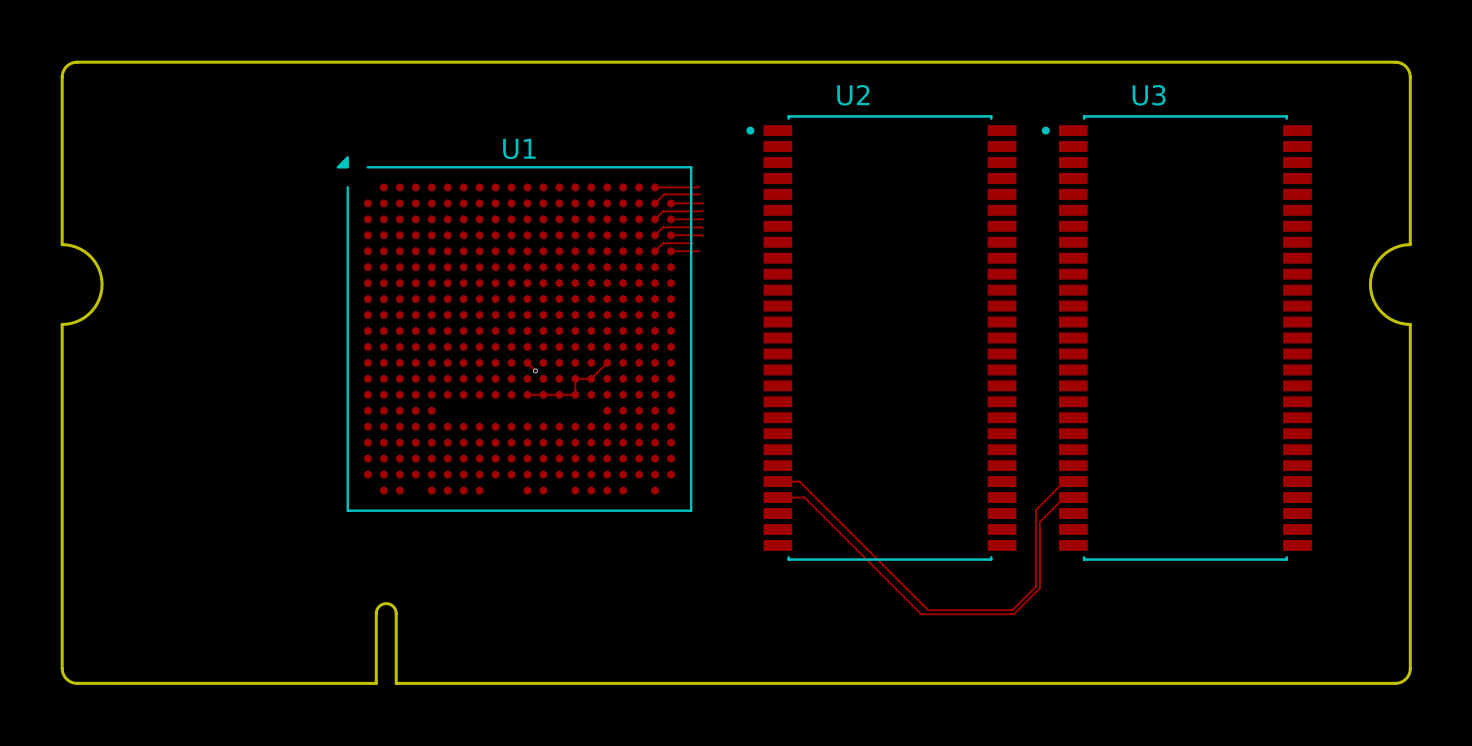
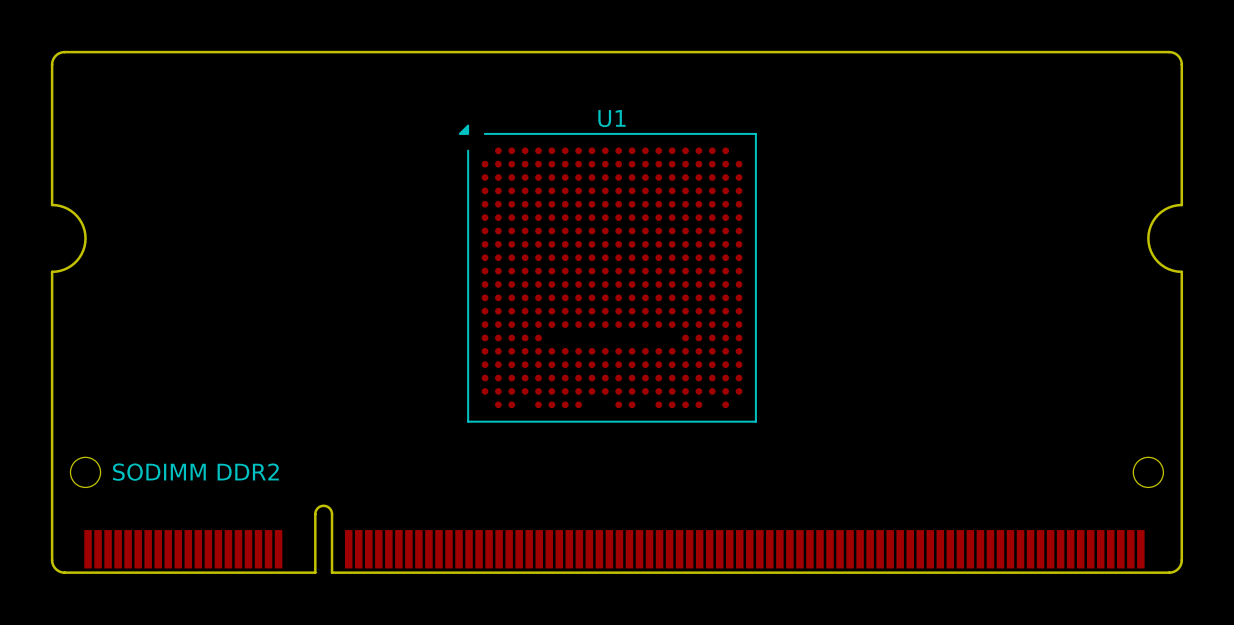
track: (698, 186) (655, 187) -> none
track: (699, 194) (664, 194) (655, 203) -> none
track: (671, 203) (702, 203) -> none
track: (702, 210) (663, 211) (655, 219) -> none
track: (671, 219) (702, 219) -> none
track: (702, 228) (663, 227) (655, 235) -> none
track: (671, 235) (702, 236) -> none
track: (692, 243) (663, 243) (655, 251) -> none
track: (671, 251) (698, 251) -> none
U1 position: (514, 334) -> (607, 273)
U2: (881, 337) -> none
U3: (1176, 337) -> none
track: (527, 362) (535, 370) -> none
track: (607, 362) (591, 378) (575, 378) (575, 394) (527, 394) -> none
via: (535, 370) -> none
track: (777, 481) (799, 481) (928, 610) (1012, 610) (1035, 586) (1035, 510) (1064, 481) (1073, 481) -> none
track: (777, 497) (804, 497) (921, 614) (1014, 614) (1039, 588) (1039, 522) (1064, 497) (1073, 497) -> none
SODIMM DDR2: none -> (616, 512)

